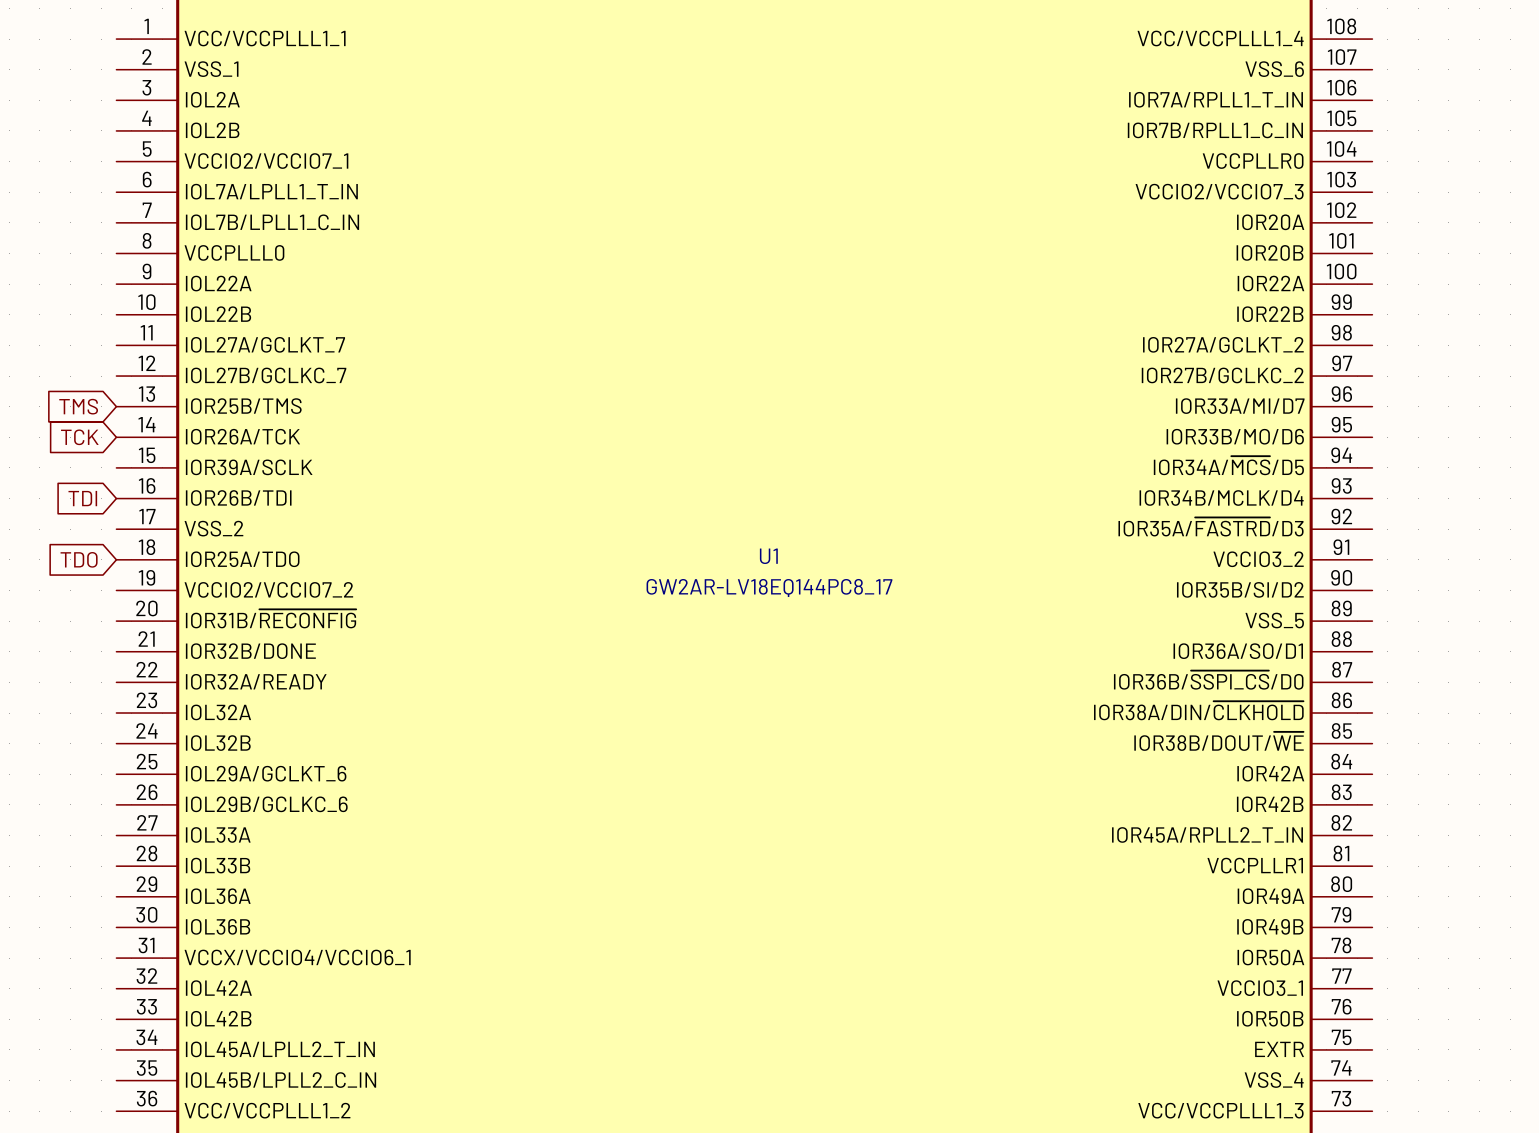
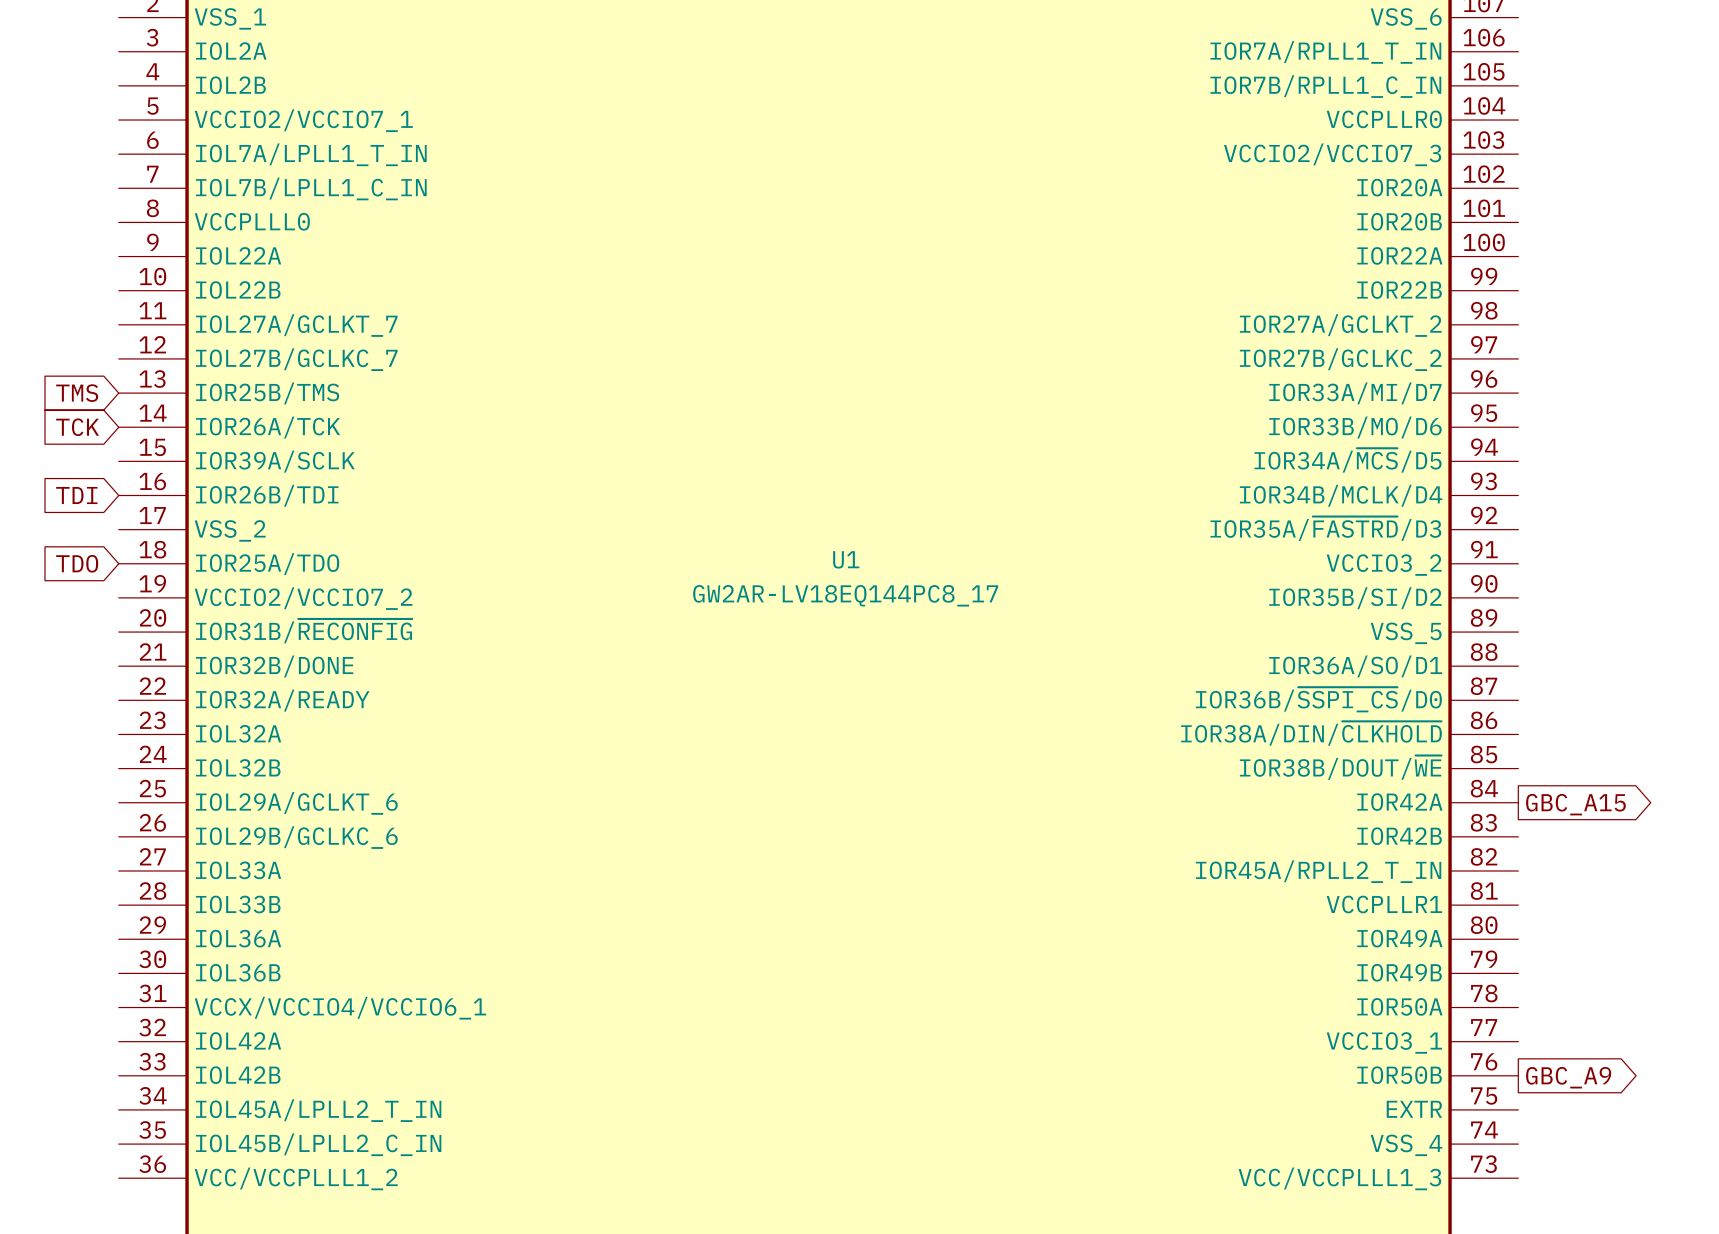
global label: none -> GBC_A15 (1575, 804)
global label: none -> GBC_A9 (1568, 1077)

